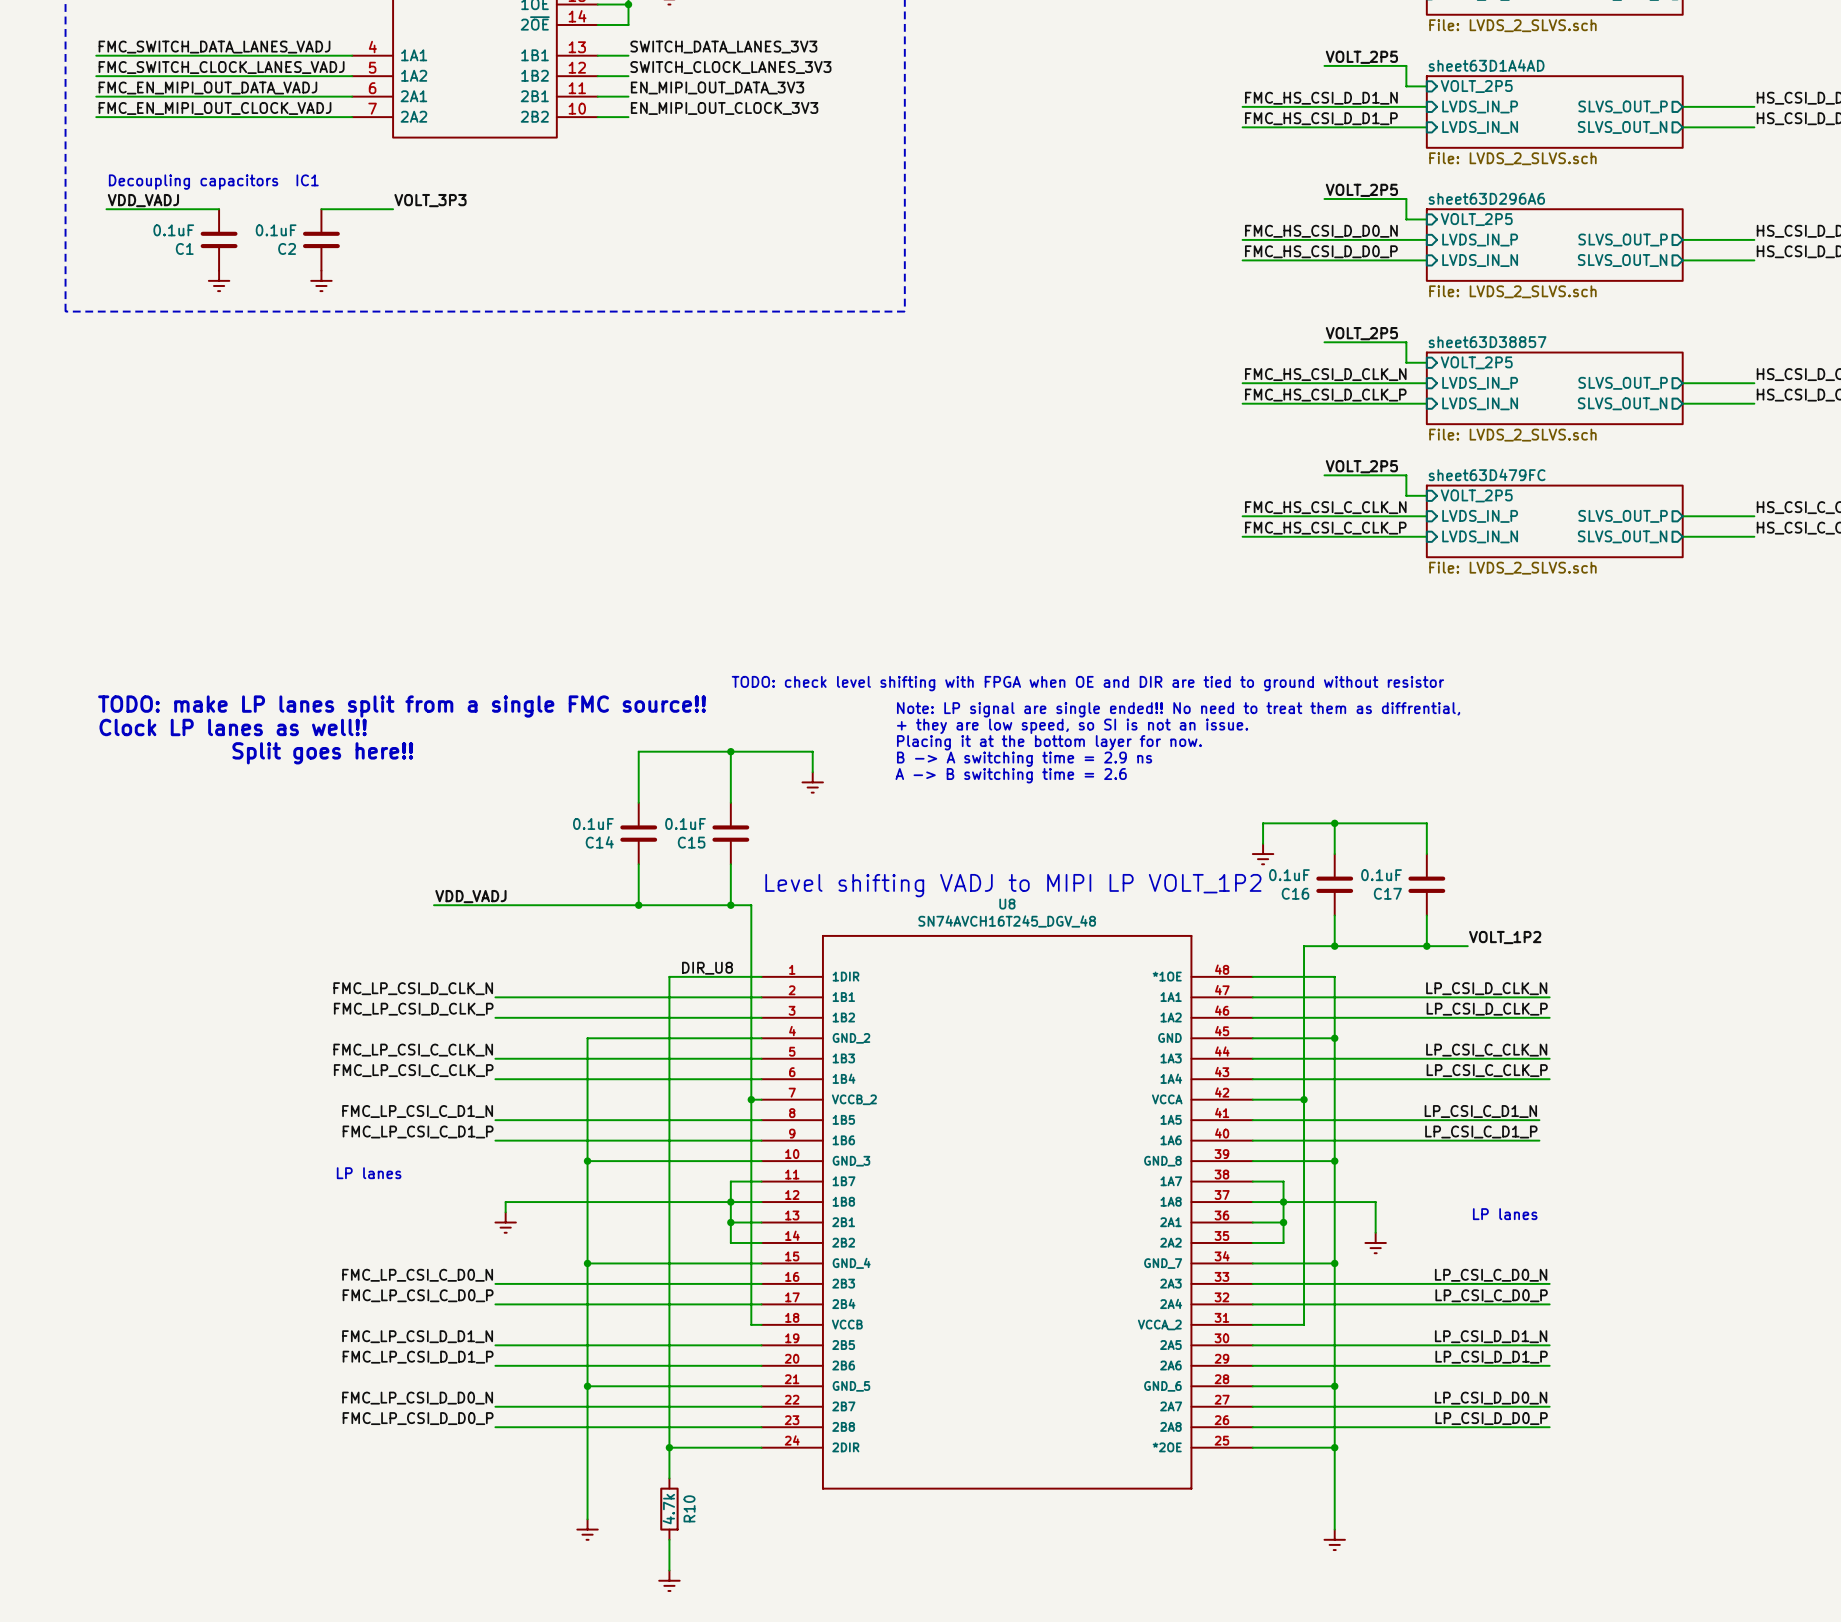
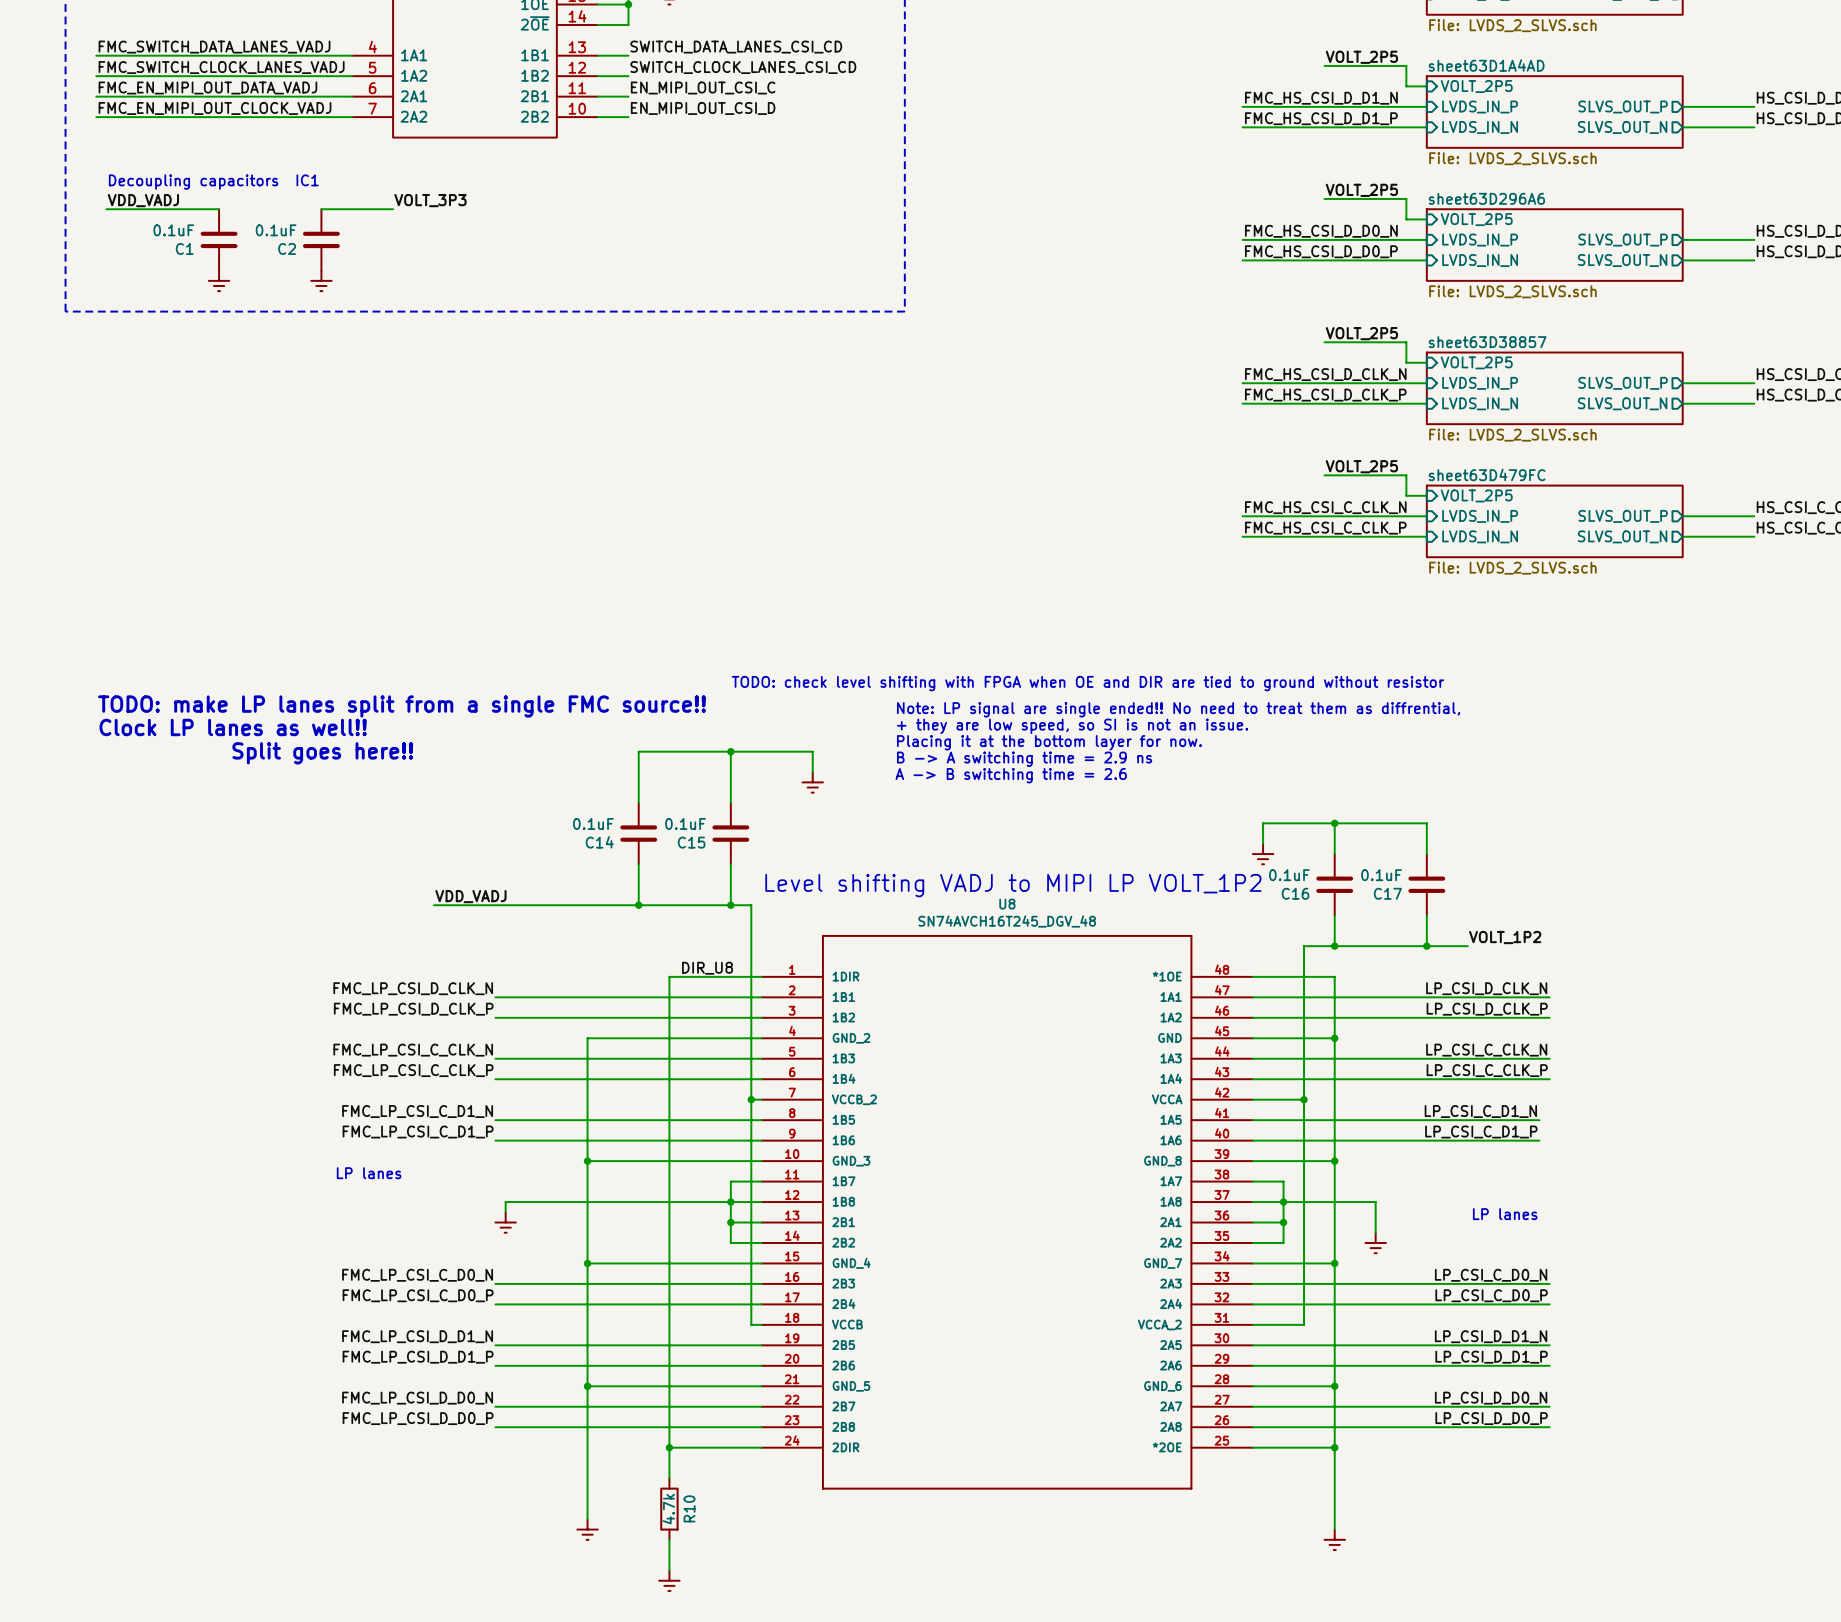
label: SWITCH_DATA_LANES_3V3 (723, 47) -> SWITCH_DATA_LANES_CSI_CD (736, 47)
label: SWITCH_CLOCK_LANES_3V3 (730, 67) -> SWITCH_CLOCK_LANES_CSI_CD (743, 67)
label: EN_MIPI_OUT_DATA_3V3 (717, 87) -> EN_MIPI_OUT_CSI_C (703, 87)
label: EN_MIPI_OUT_CLOCK_3V3 (724, 108) -> EN_MIPI_OUT_CSI_D (703, 108)

